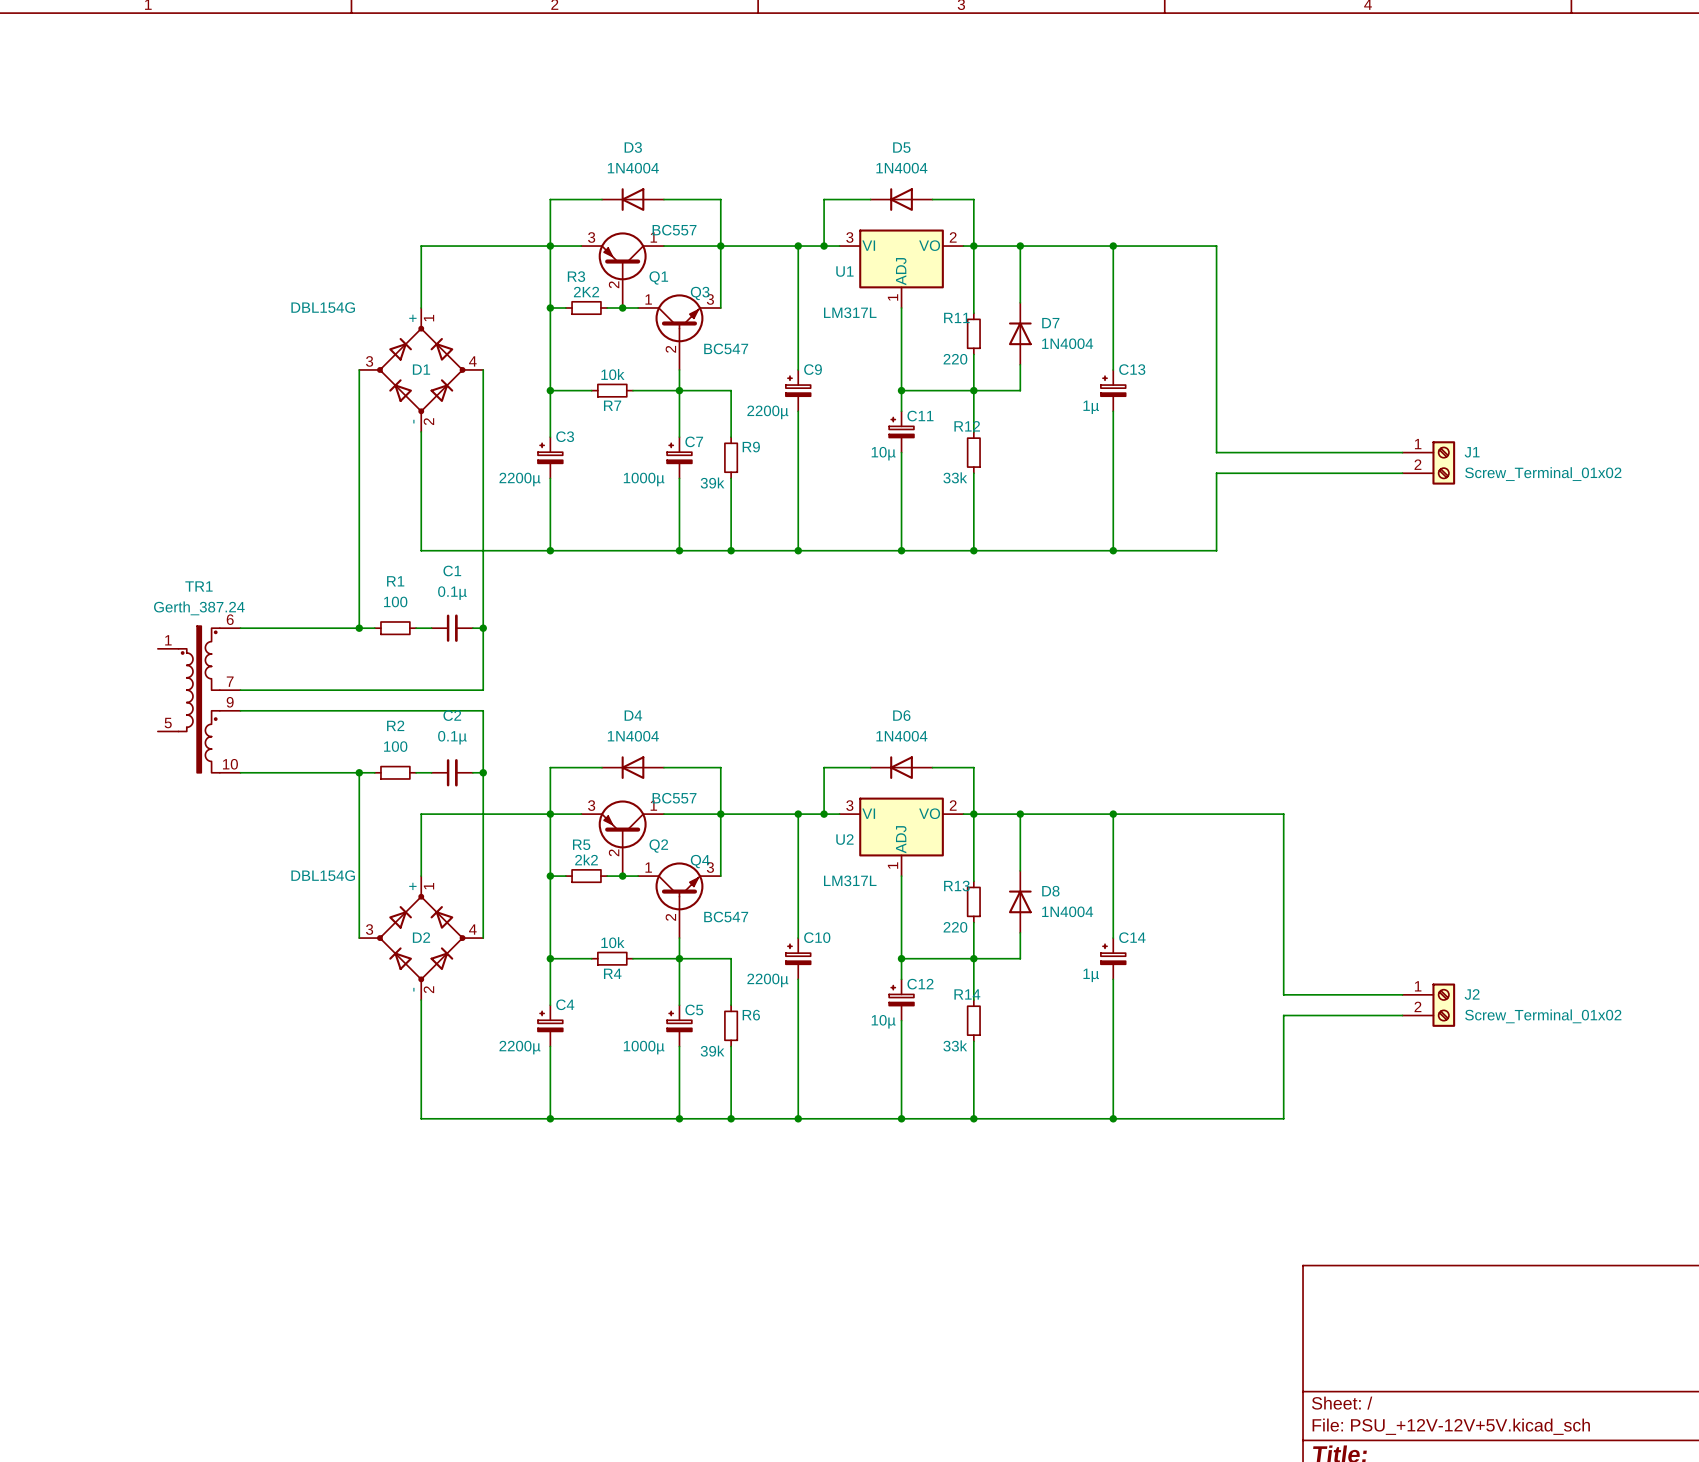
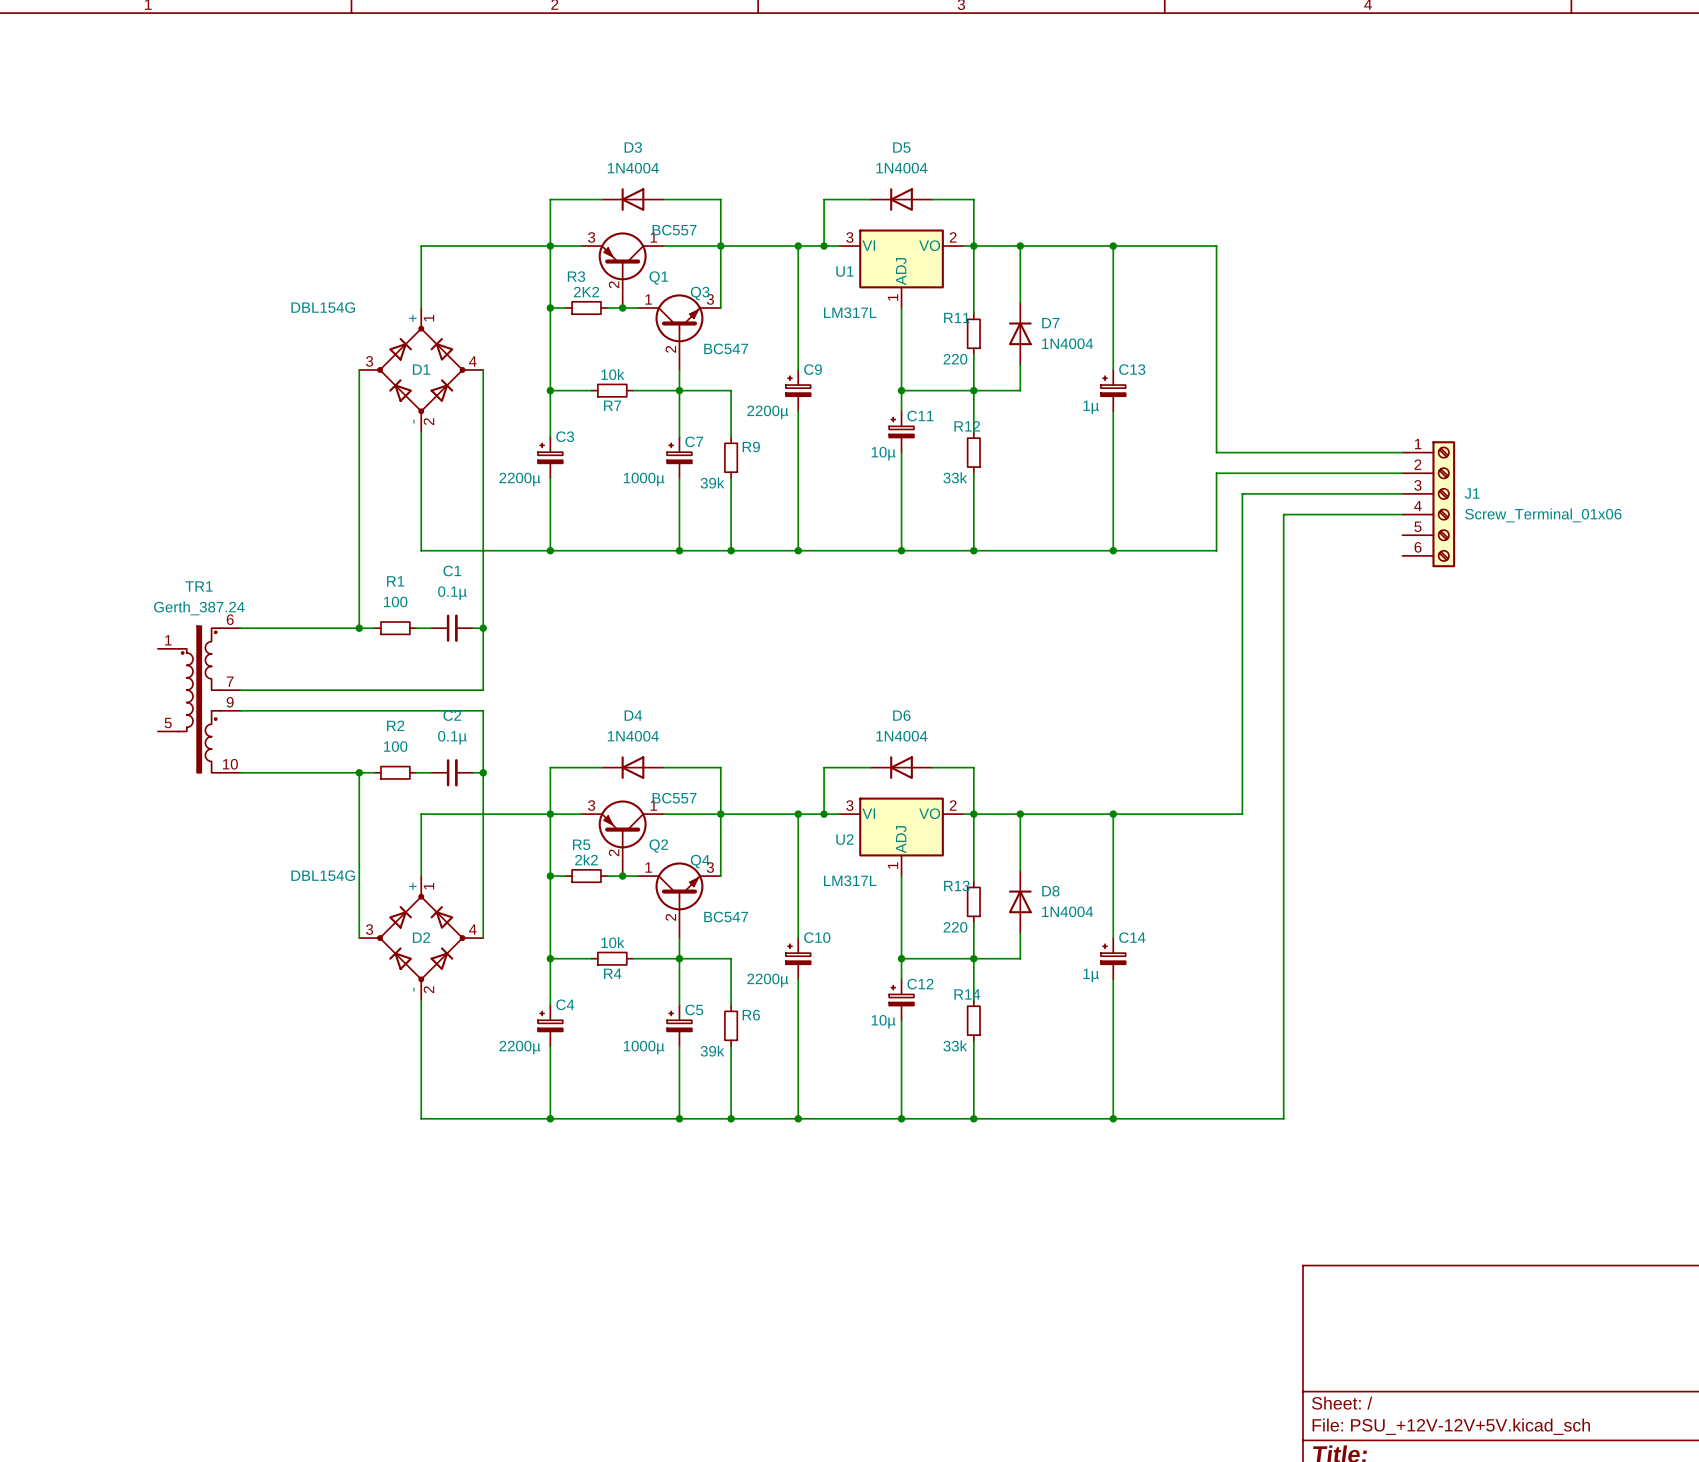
J1 symbol: [1402, 441, 1456, 485] -> [1402, 441, 1456, 568]
J1 value: Screw_Terminal_01x02 (1543, 474) -> Screw_Terminal_01x06 (1543, 515)
wire: none -> (1402, 493) (1242, 493) (1242, 814)
wire: (1242, 814) (1283, 814) -> (1402, 514) (1283, 514) (1283, 814)
wire: (1283, 994) (1402, 994) -> (1283, 994) (1283, 1015)
J2: Screw_Terminal_01x02 (1428, 1005) -> none
wire: (1283, 1015) (1402, 1015) -> none

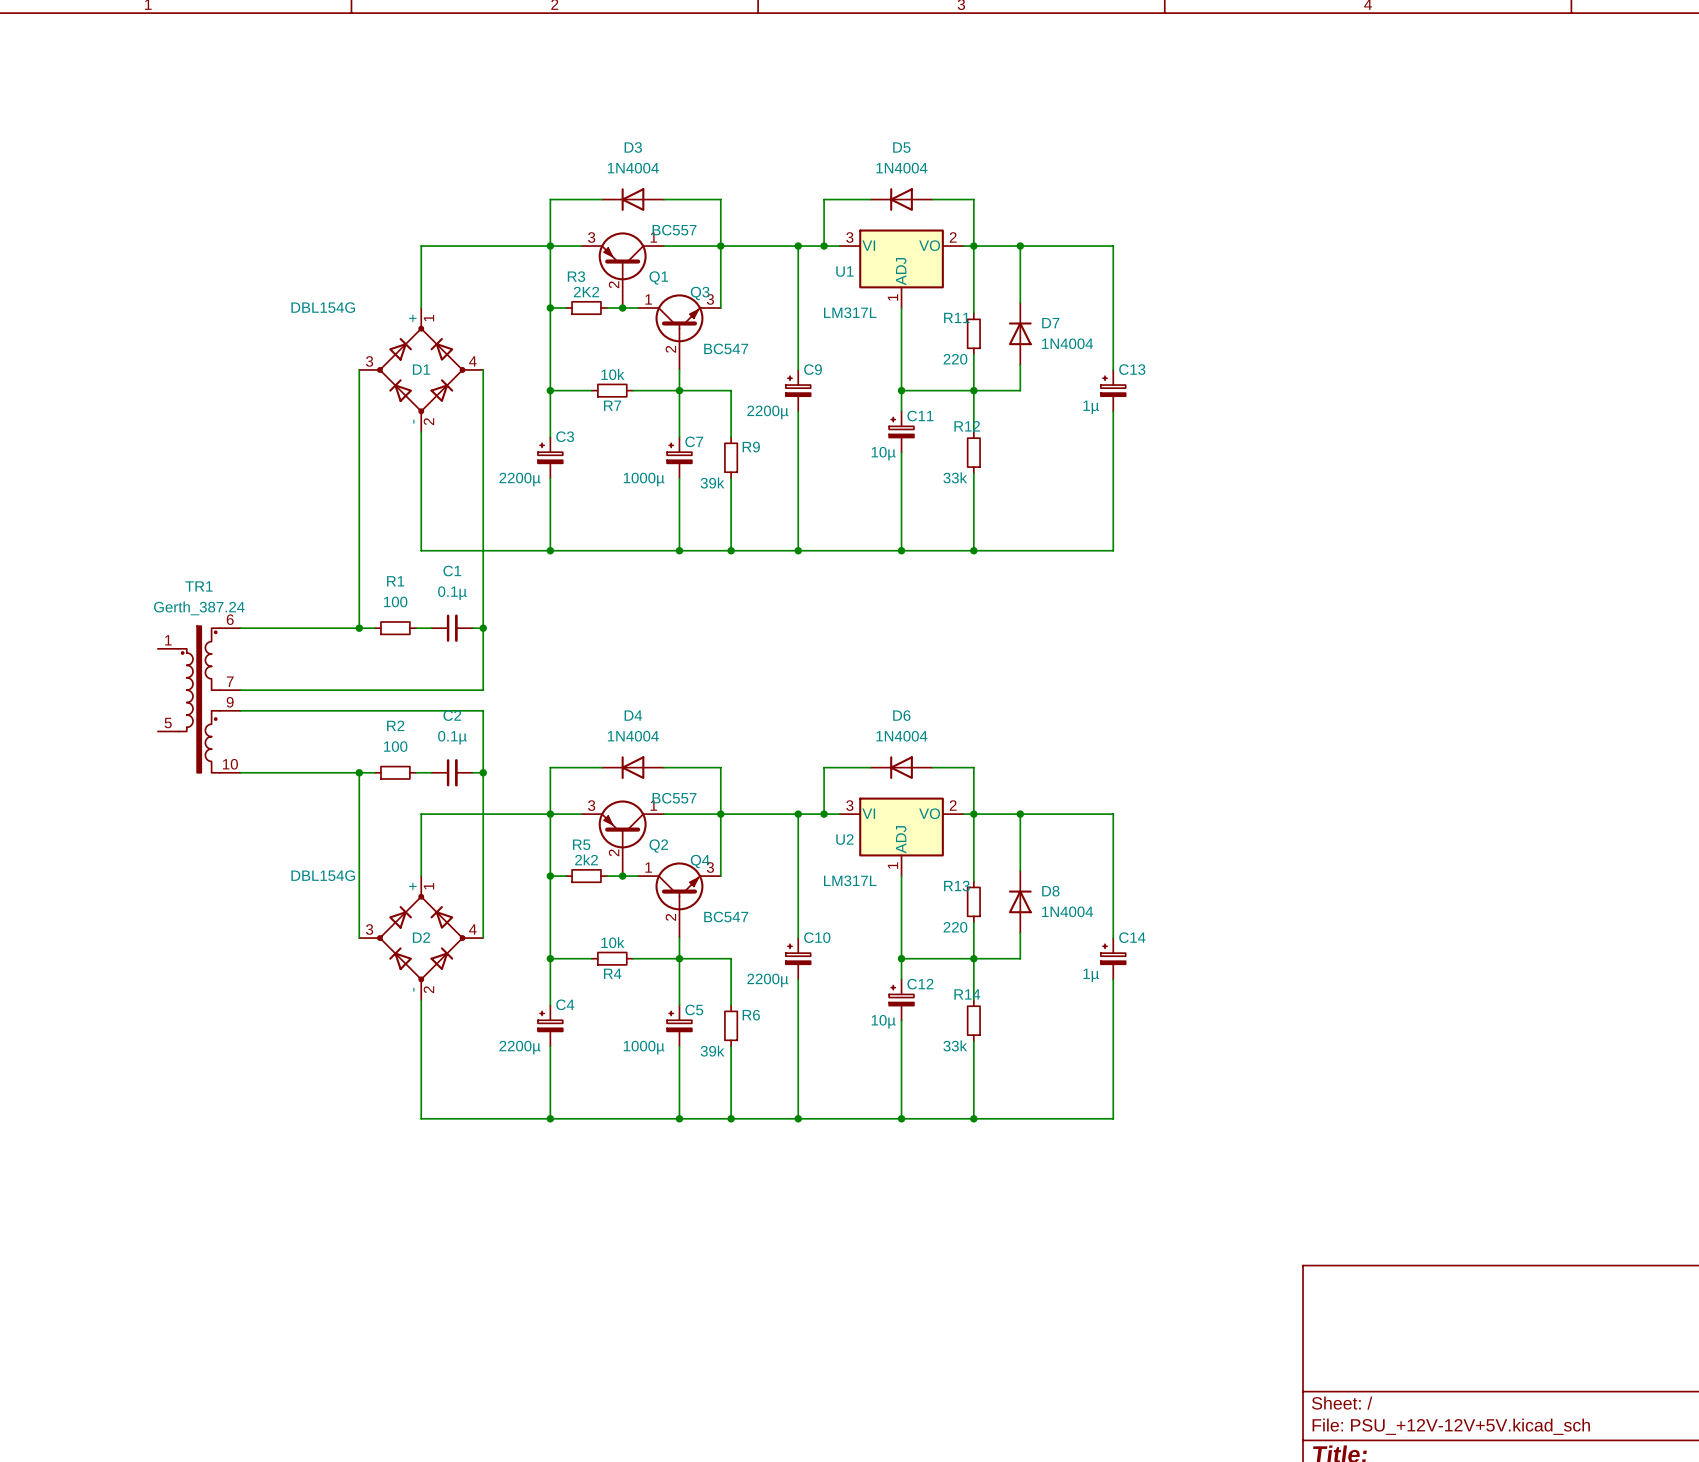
wire: (1113, 246) (1216, 246) (1216, 452) (1402, 452) -> none
junction: (1113, 246) -> none
wire: (1402, 473) (1216, 473) (1216, 550) (1113, 550) -> none
wire: (1402, 493) (1242, 493) (1242, 814) (1113, 814) -> none
J1: Screw_Terminal_01x06 (1428, 504) -> none
wire: (1402, 514) (1283, 514) (1283, 1118) (1113, 1118) -> none
junction: (1113, 550) -> none
junction: (1113, 814) -> none
junction: (1113, 1118) -> none

